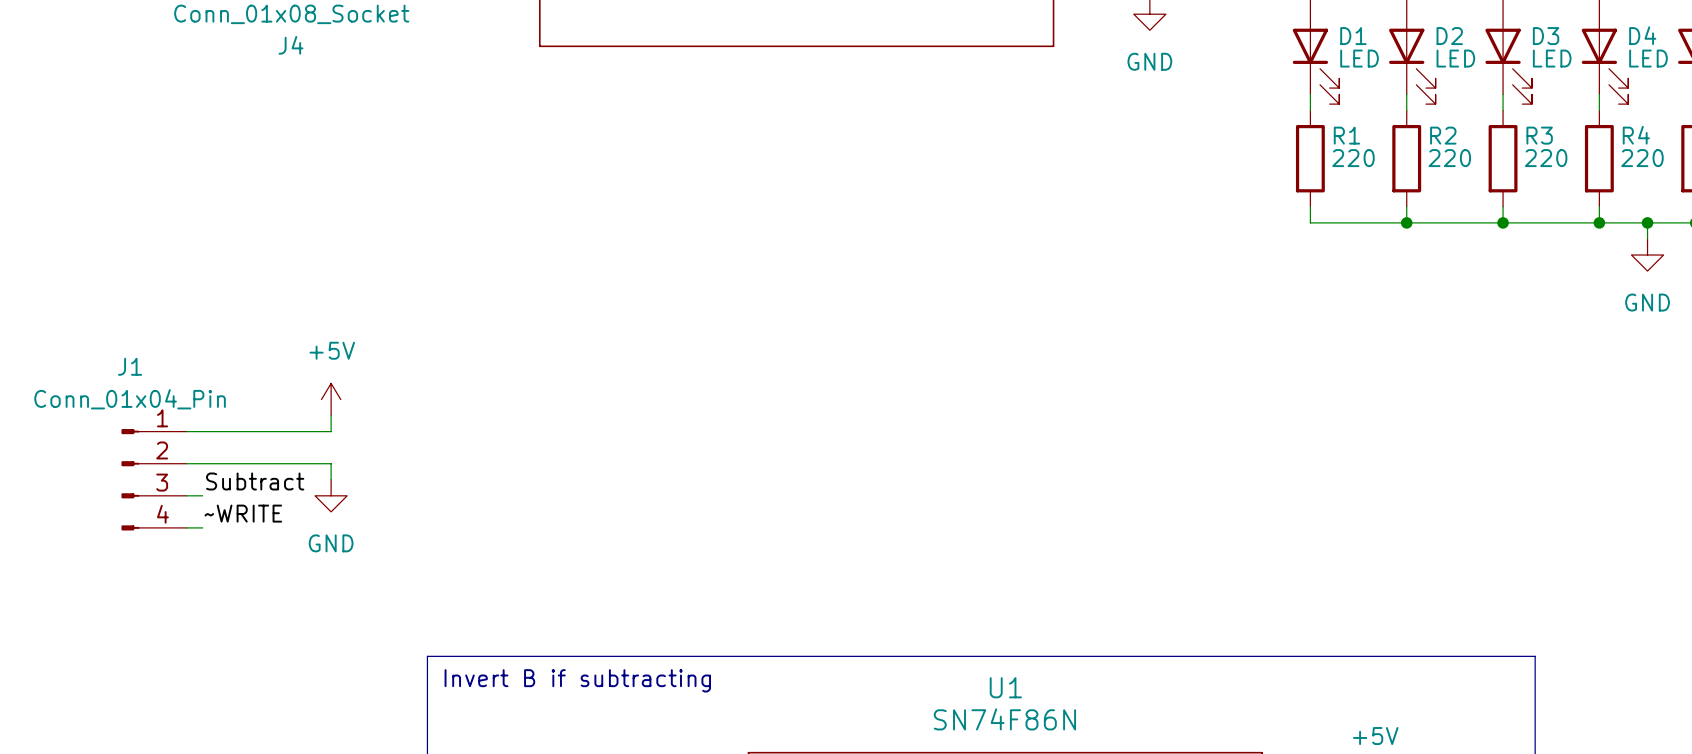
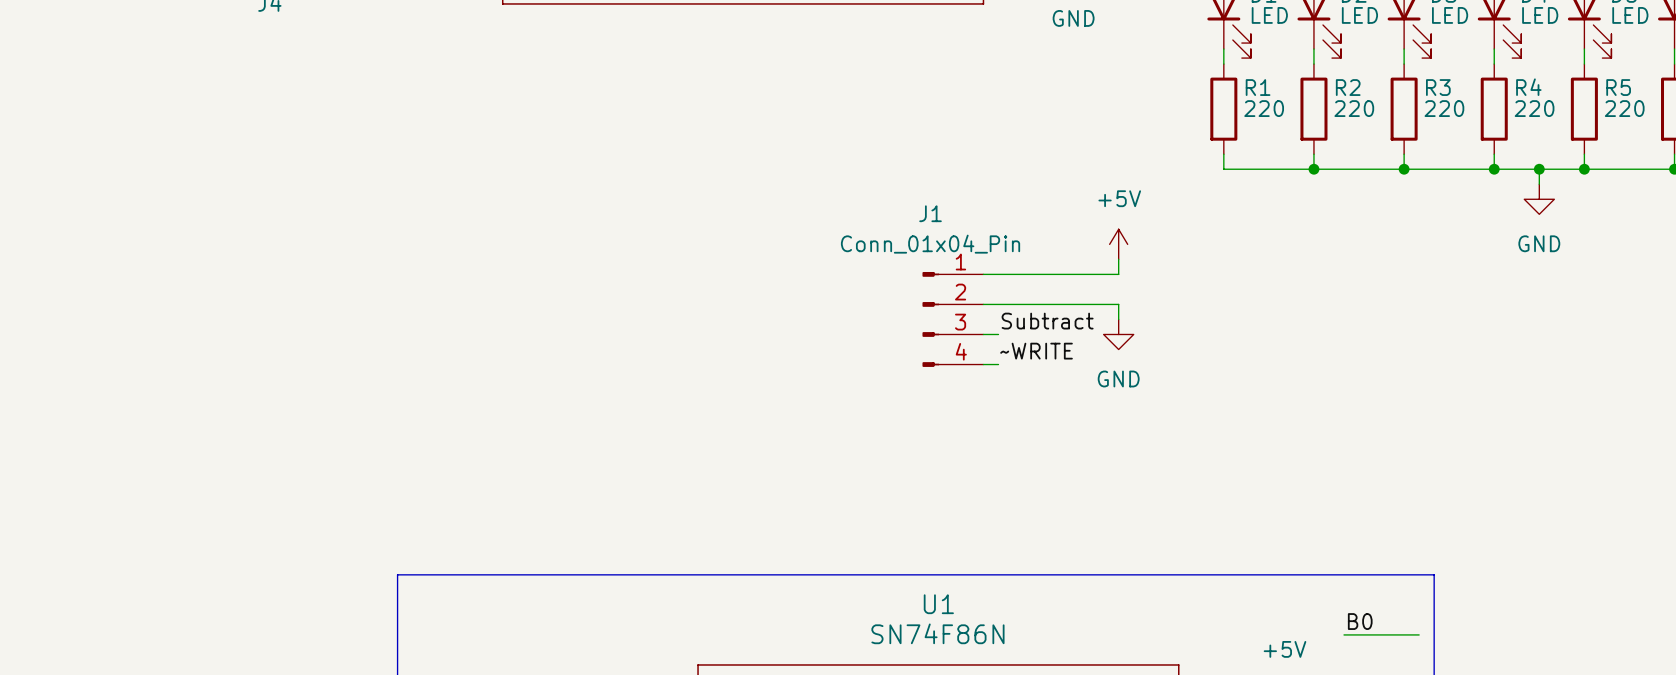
power symbol: none -> +5V (1118, 244)
wire: none -> (1118, 259) (1118, 274) (983, 274)
wire: none -> (983, 304) (1118, 304) (1118, 319)
label: none -> Subtract (1047, 321)
power symbol: +5V (331, 399) -> none
wire: none -> (983, 334) (998, 334)
power symbol: none -> GND (1118, 334)
wire: (331, 415) (331, 431) (186, 431) -> none
label: none -> ~WRITE (1036, 351)
wire: none -> (983, 364) (998, 364)
wire: (186, 463) (331, 463) (331, 479) -> none
J1 position: (154, 479) -> (952, 319)
label: Subtract (255, 481) -> none
wire: (186, 495) (202, 495) -> none
power symbol: GND (331, 495) -> none
label: ~WRITE (243, 513) -> none
wire: (186, 527) (202, 527) -> none
text: Invert B if subtracting (577, 680) -> none
label: none -> B0 (1360, 621)
wire: none -> (1344, 634) (1419, 634)

